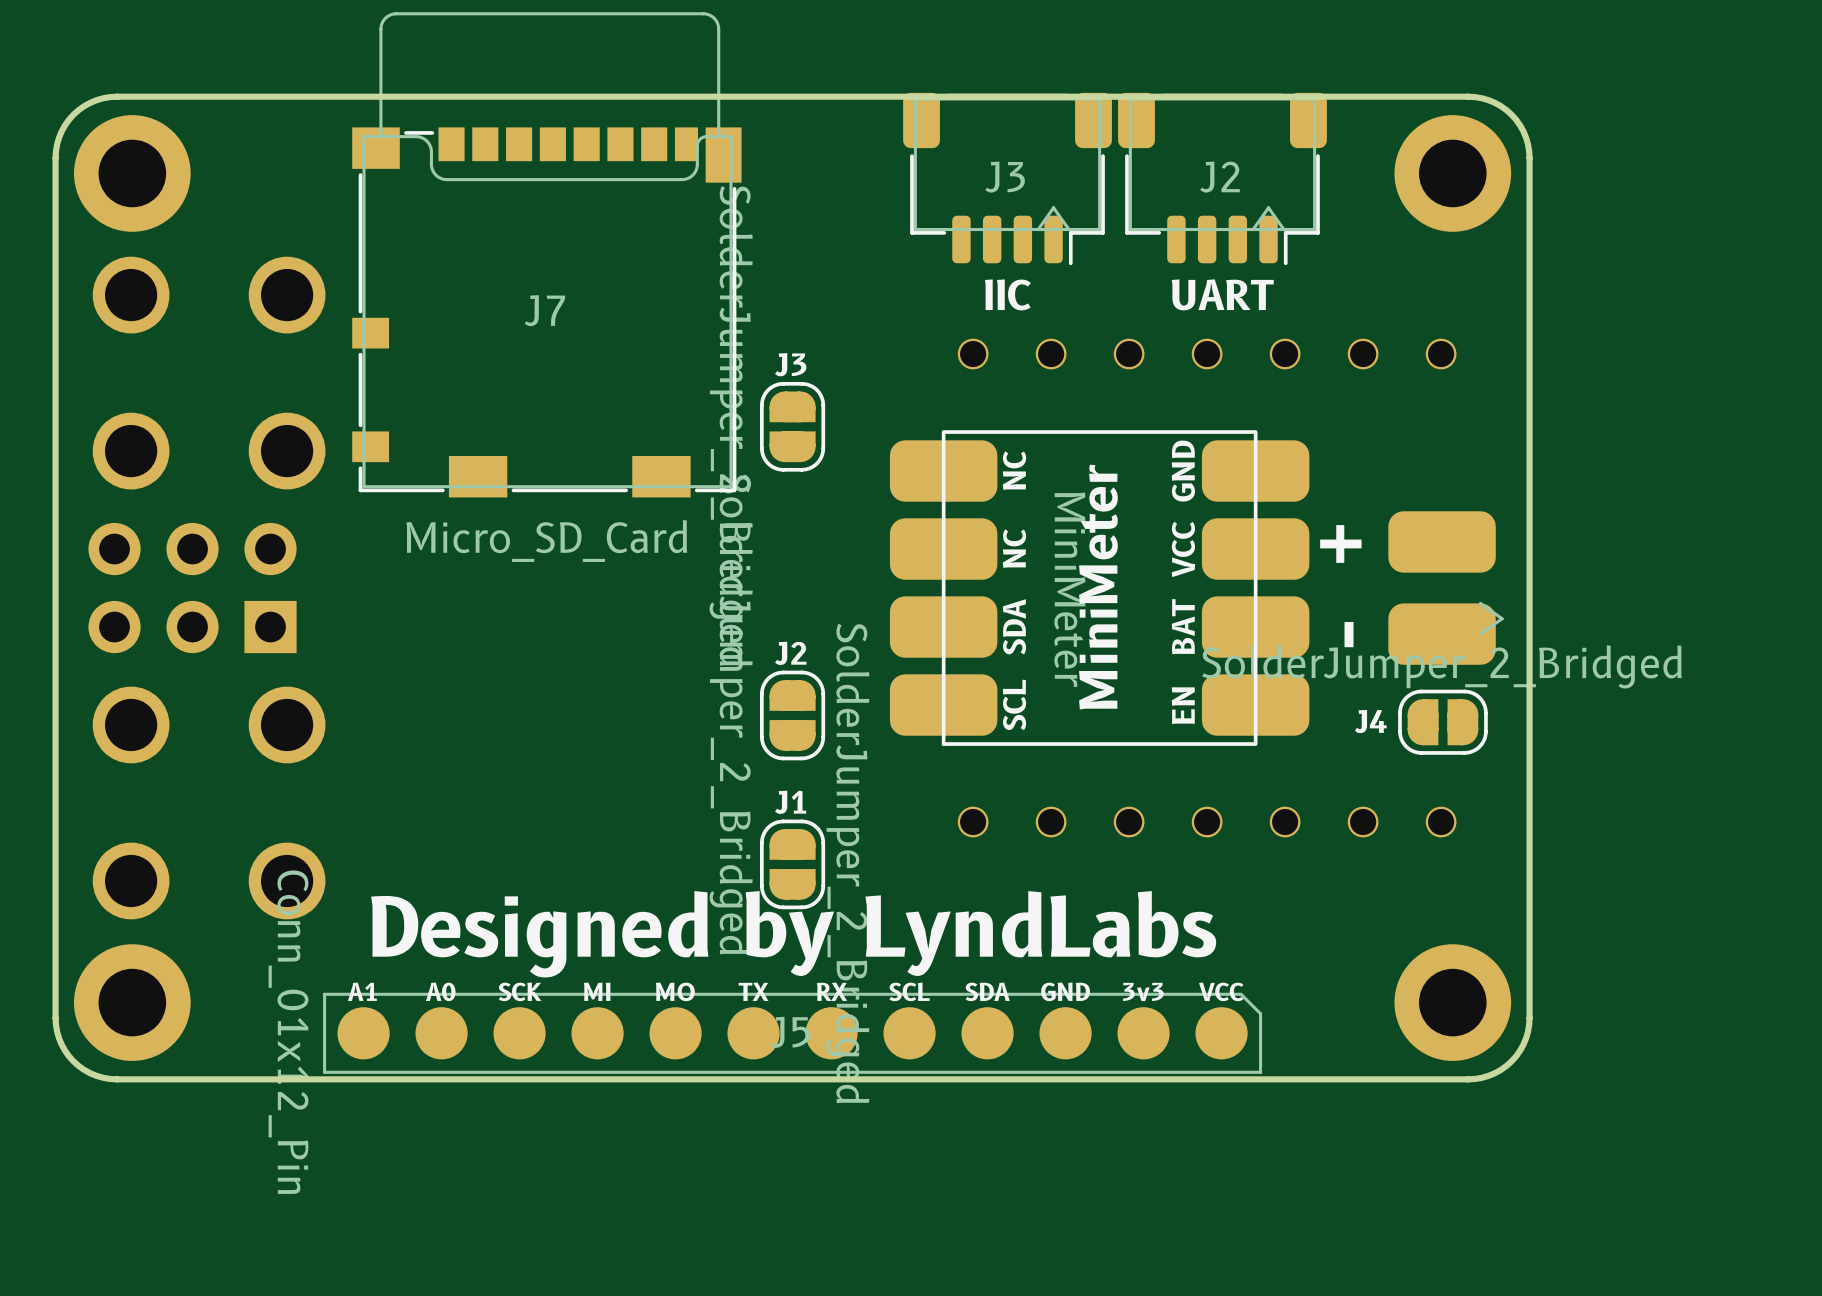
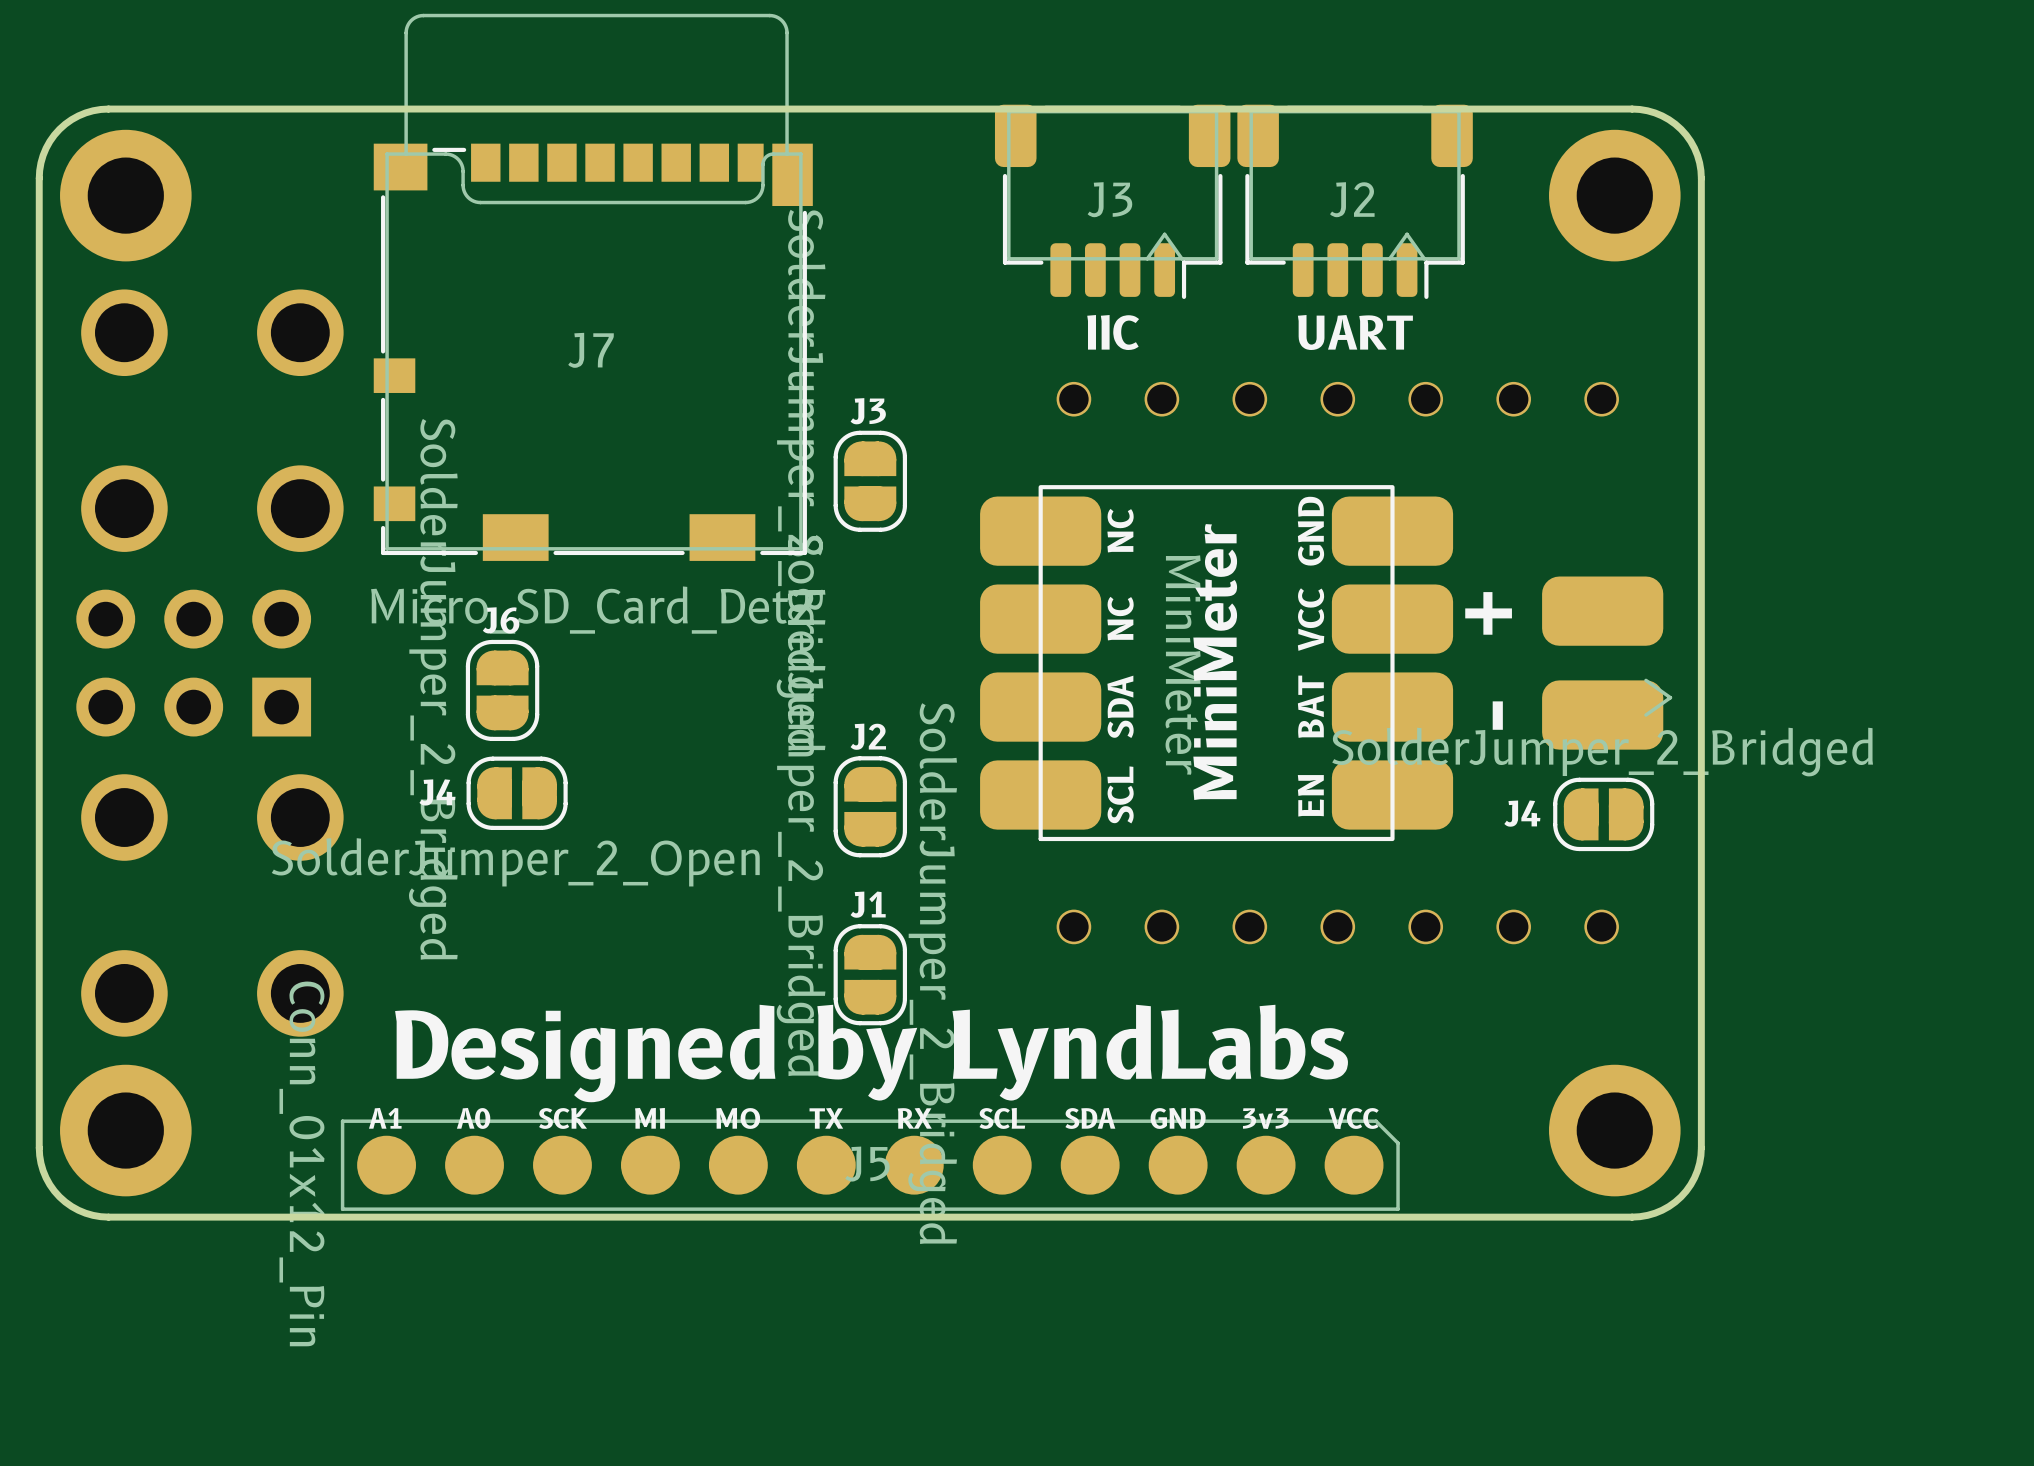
J7 value: Micro_SD_Card (546, 541) -> Micro_SD_Card_Det2 (592, 610)
part: none -> SolderJumper_2_Bridged (502, 690)
part: none -> SolderJumper_2_Open (517, 793)

